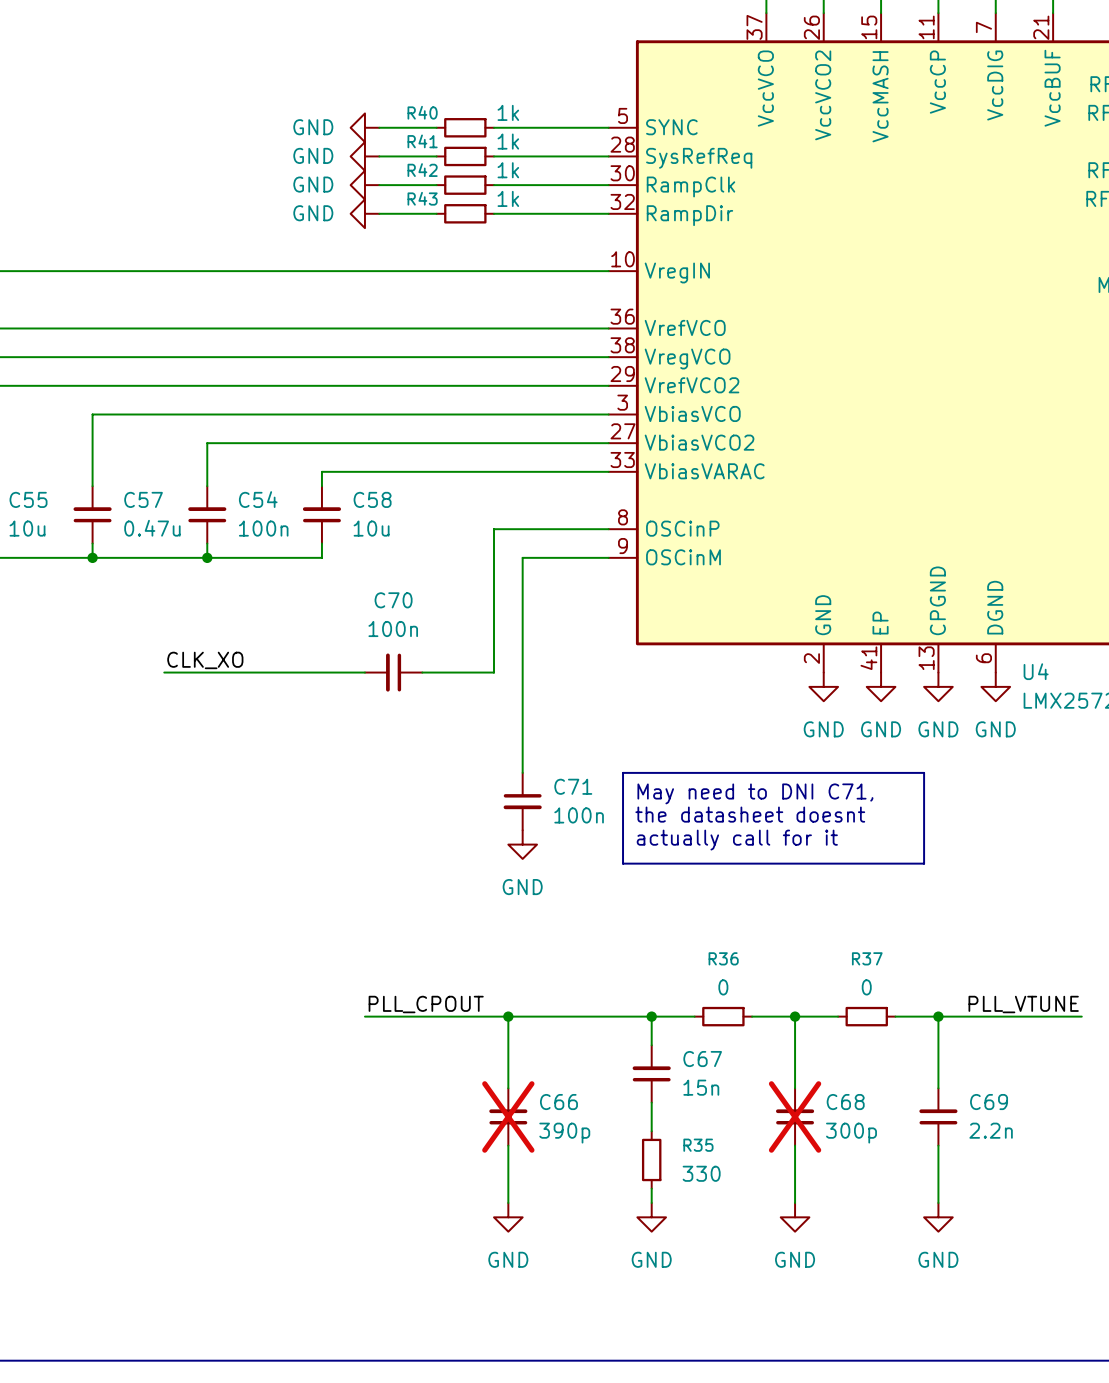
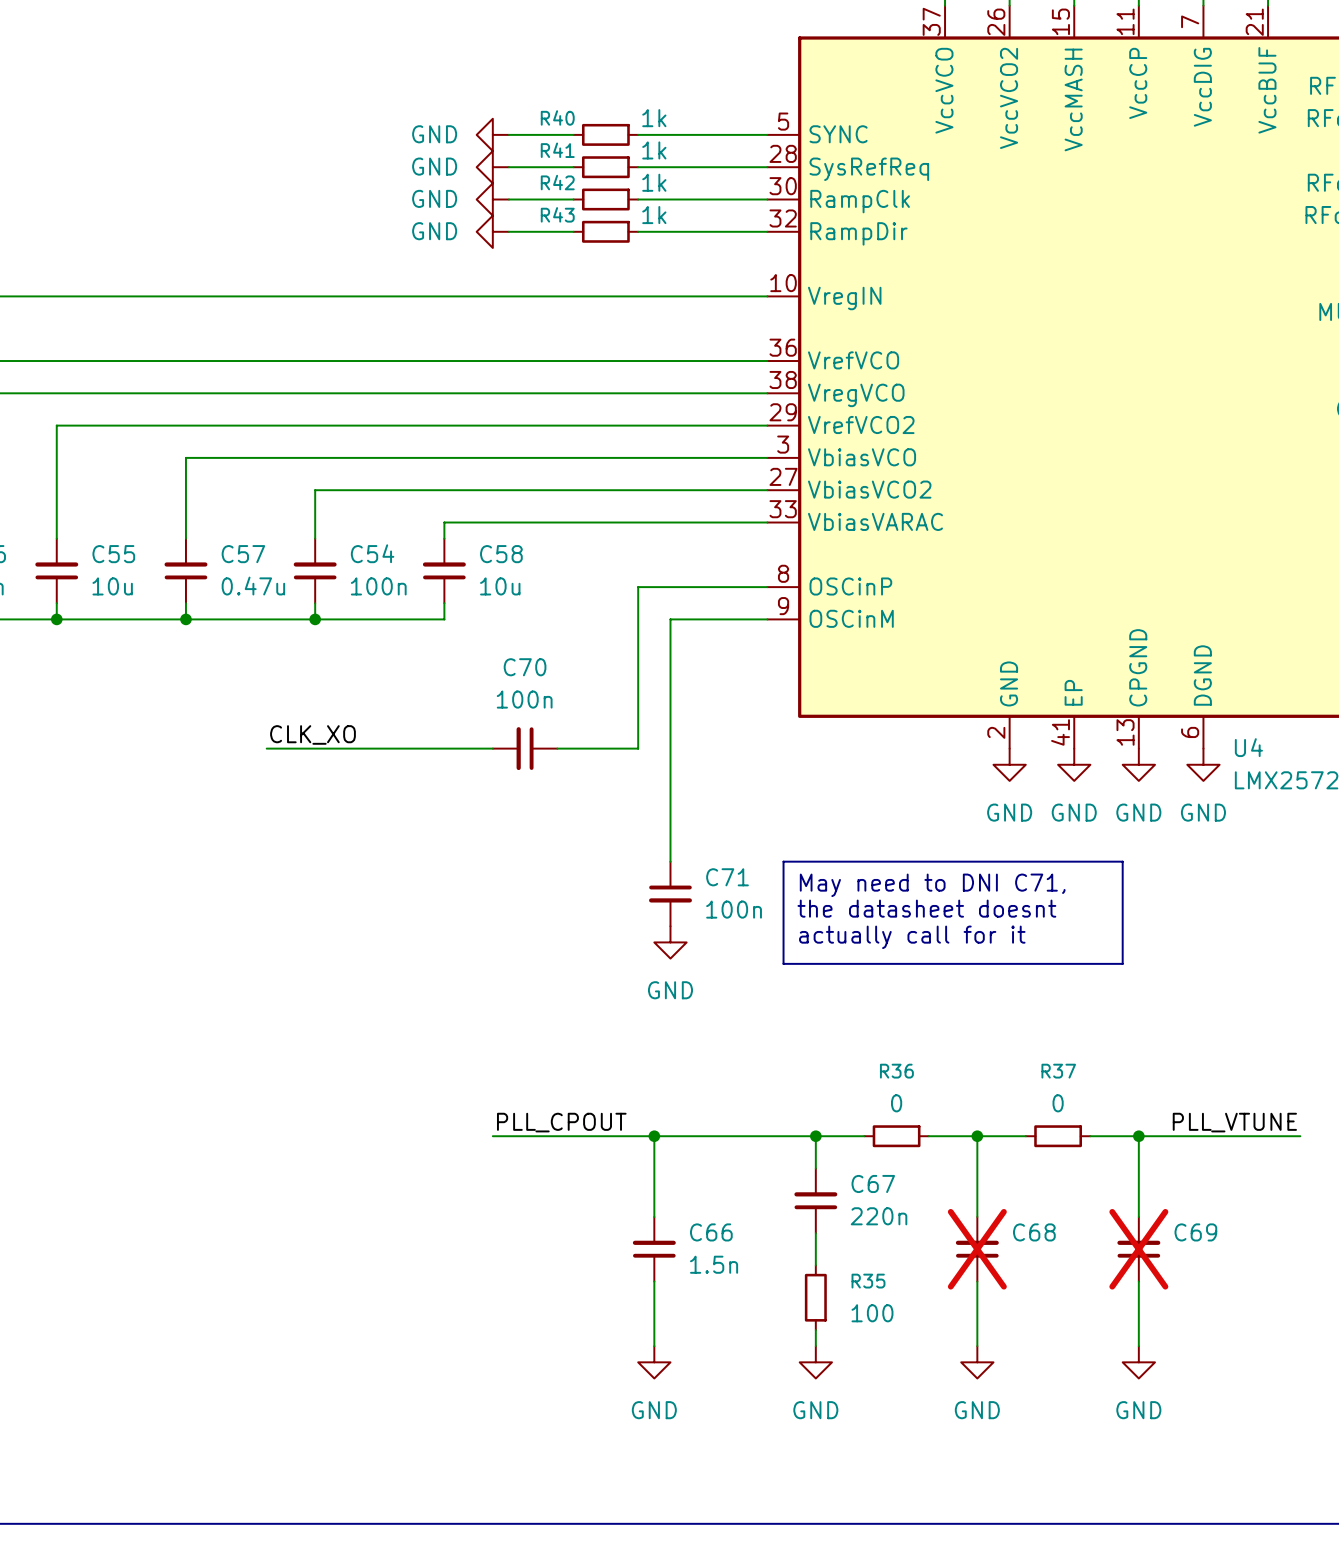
C67 value: 15n (701, 1087) -> 220n (879, 1216)
C66 do-not-place cross: (508, 1116) -> none
C69 do-not-place cross: none -> (1138, 1249)
C69 value: 2.2n (991, 1130) -> none
C66 value: 390p (564, 1133) -> 1.5n (714, 1264)
C68 value: 300p (851, 1133) -> none
R35 value: 330 (701, 1173) -> 100 (872, 1313)

